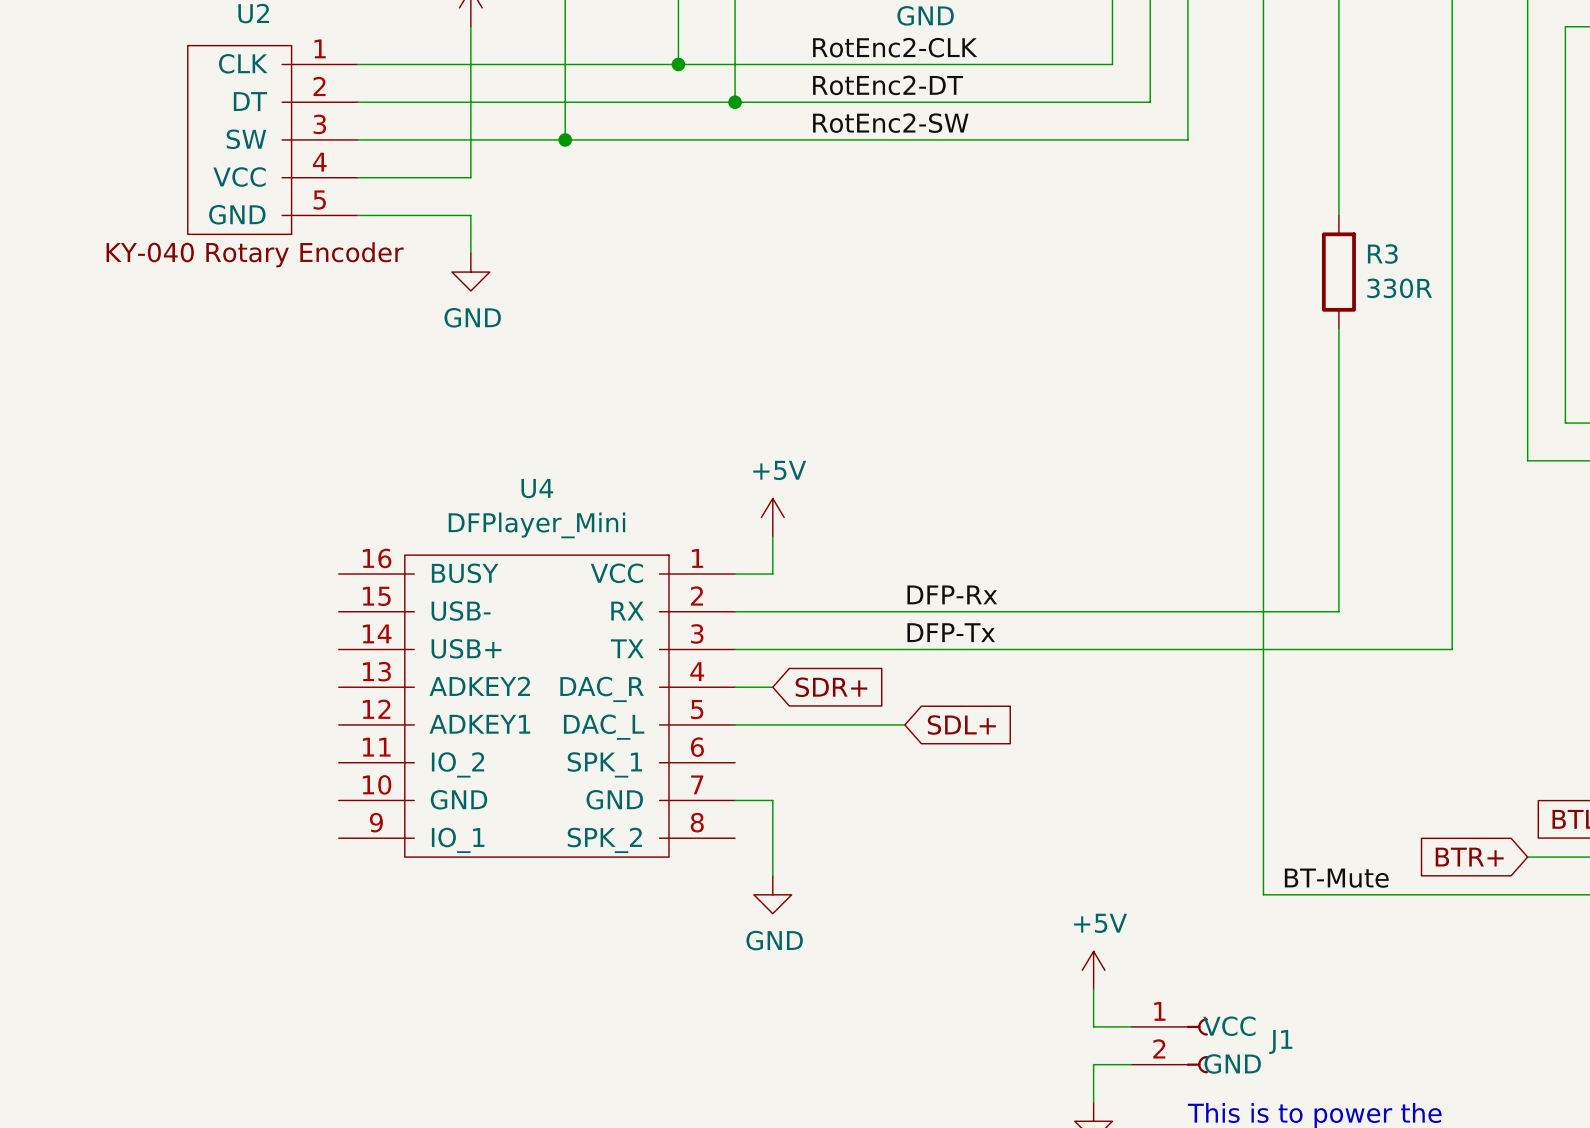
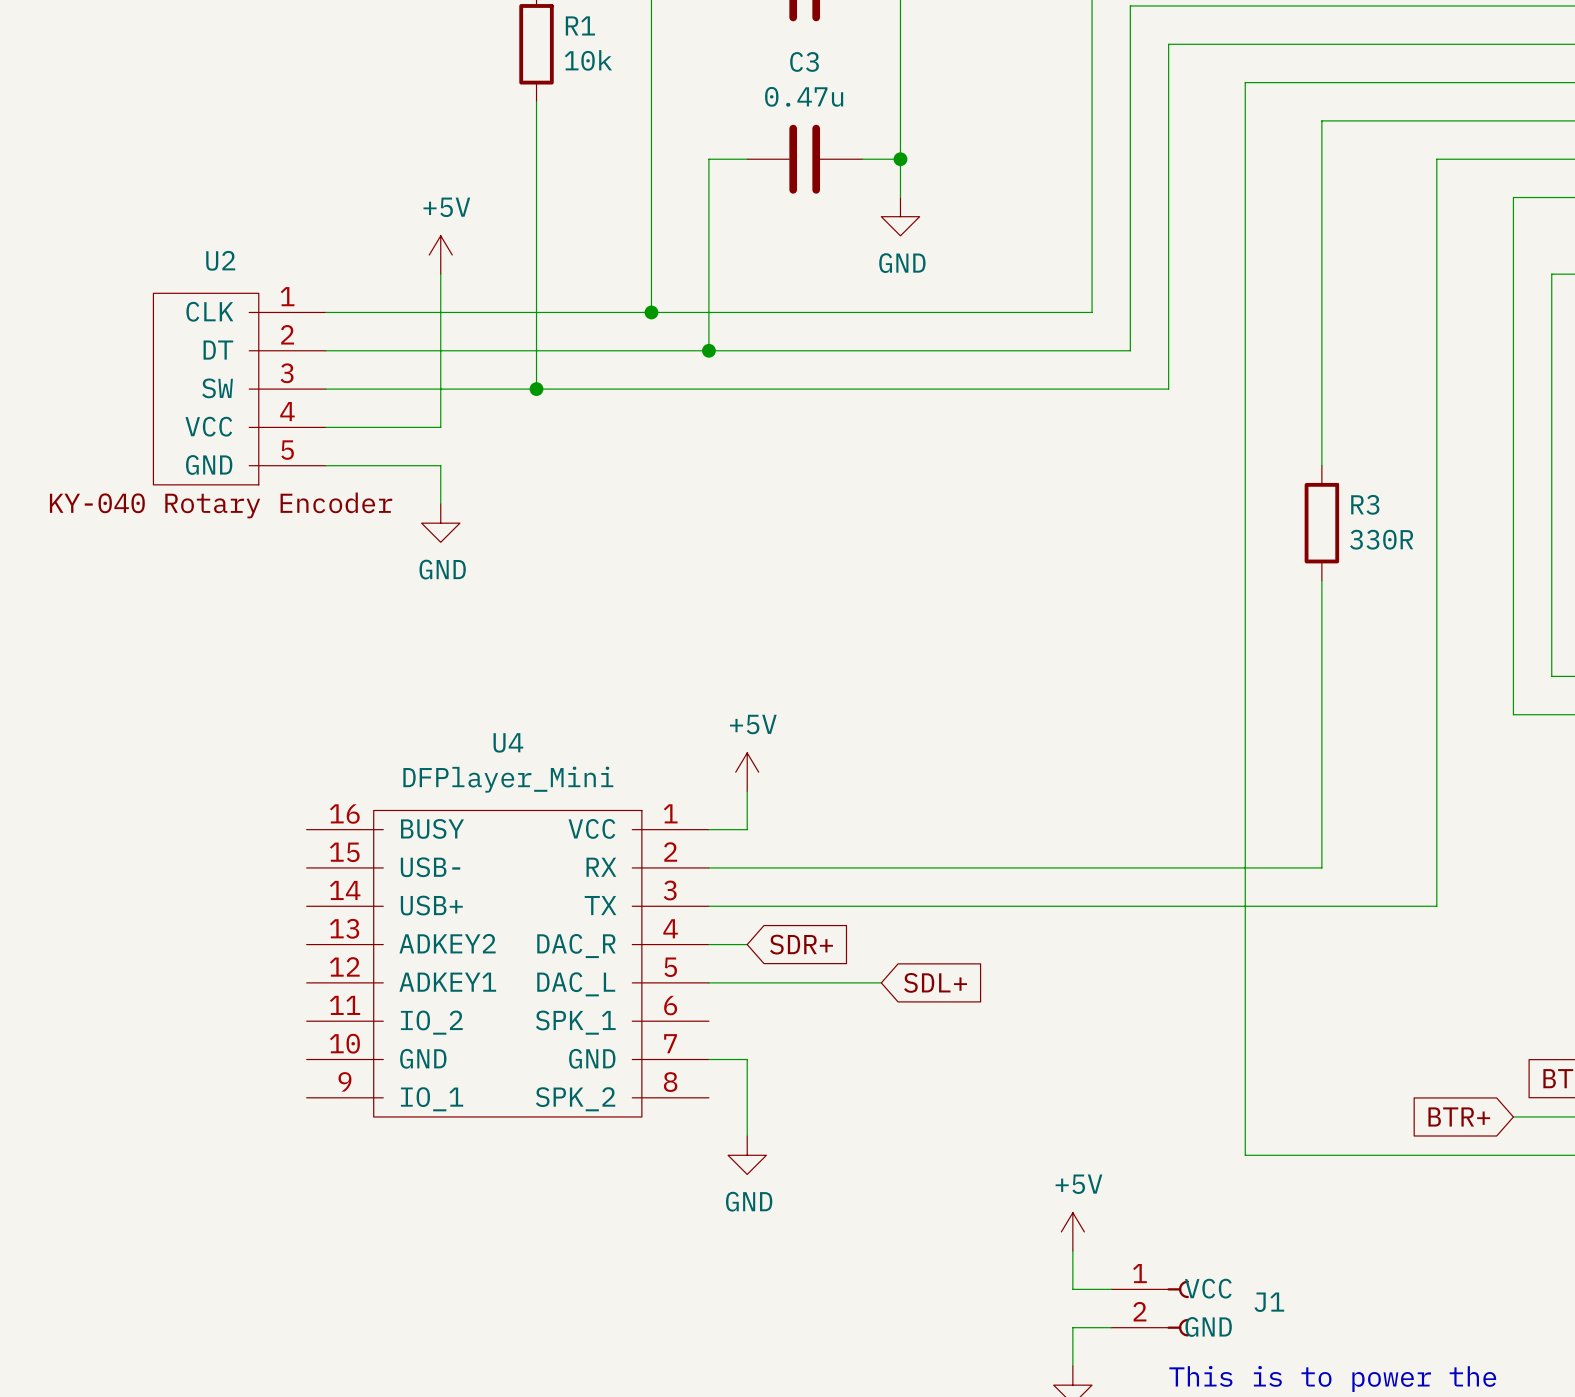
label: RotEnc2-CLK (895, 47) -> none
label: RotEnc2-DT (888, 85) -> none
label: RotEnc2-SW (890, 123) -> none
label: DFP-Rx (952, 594) -> none
label: DFP-Tx (951, 632) -> none
label: BT-Mute (1336, 878) -> none

